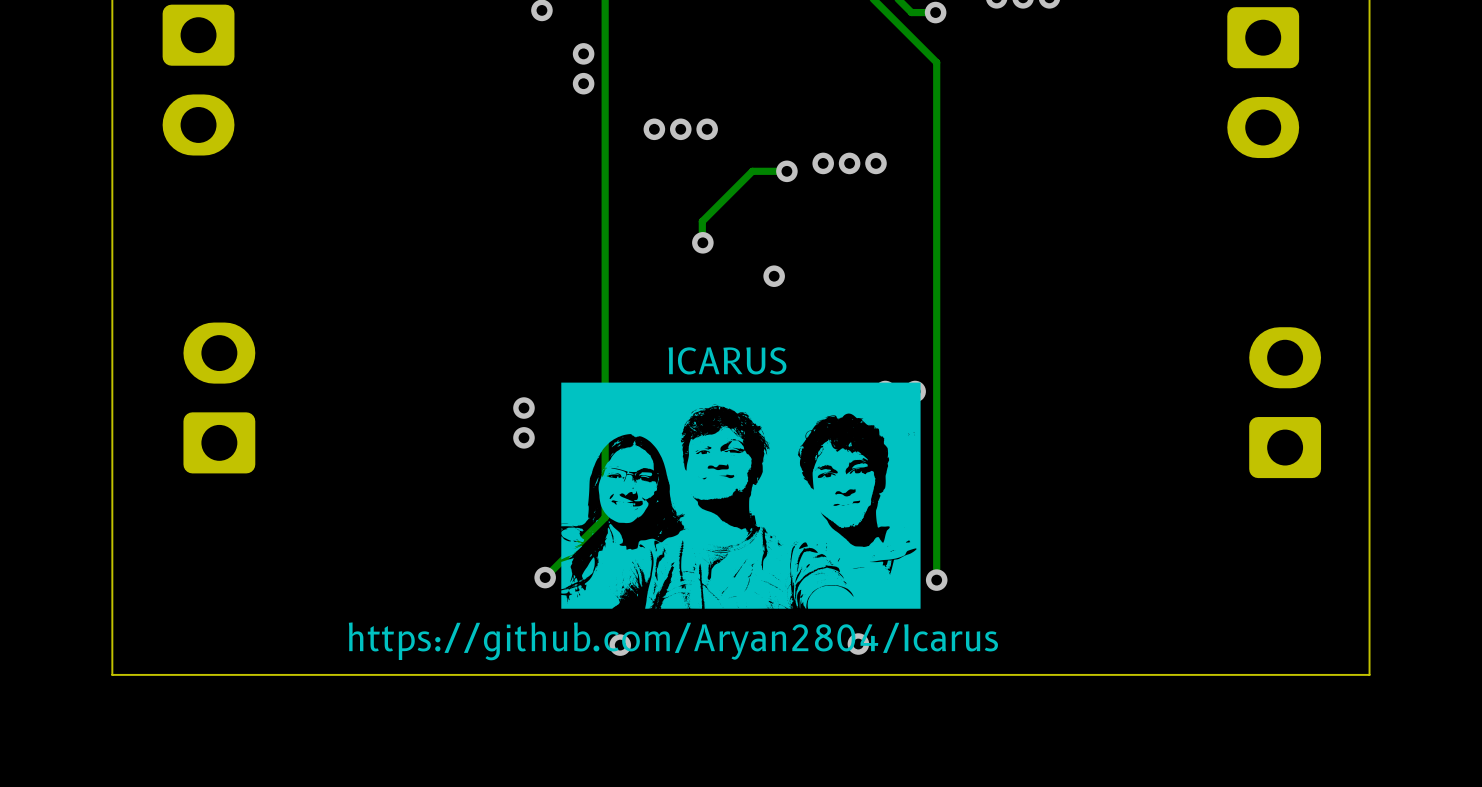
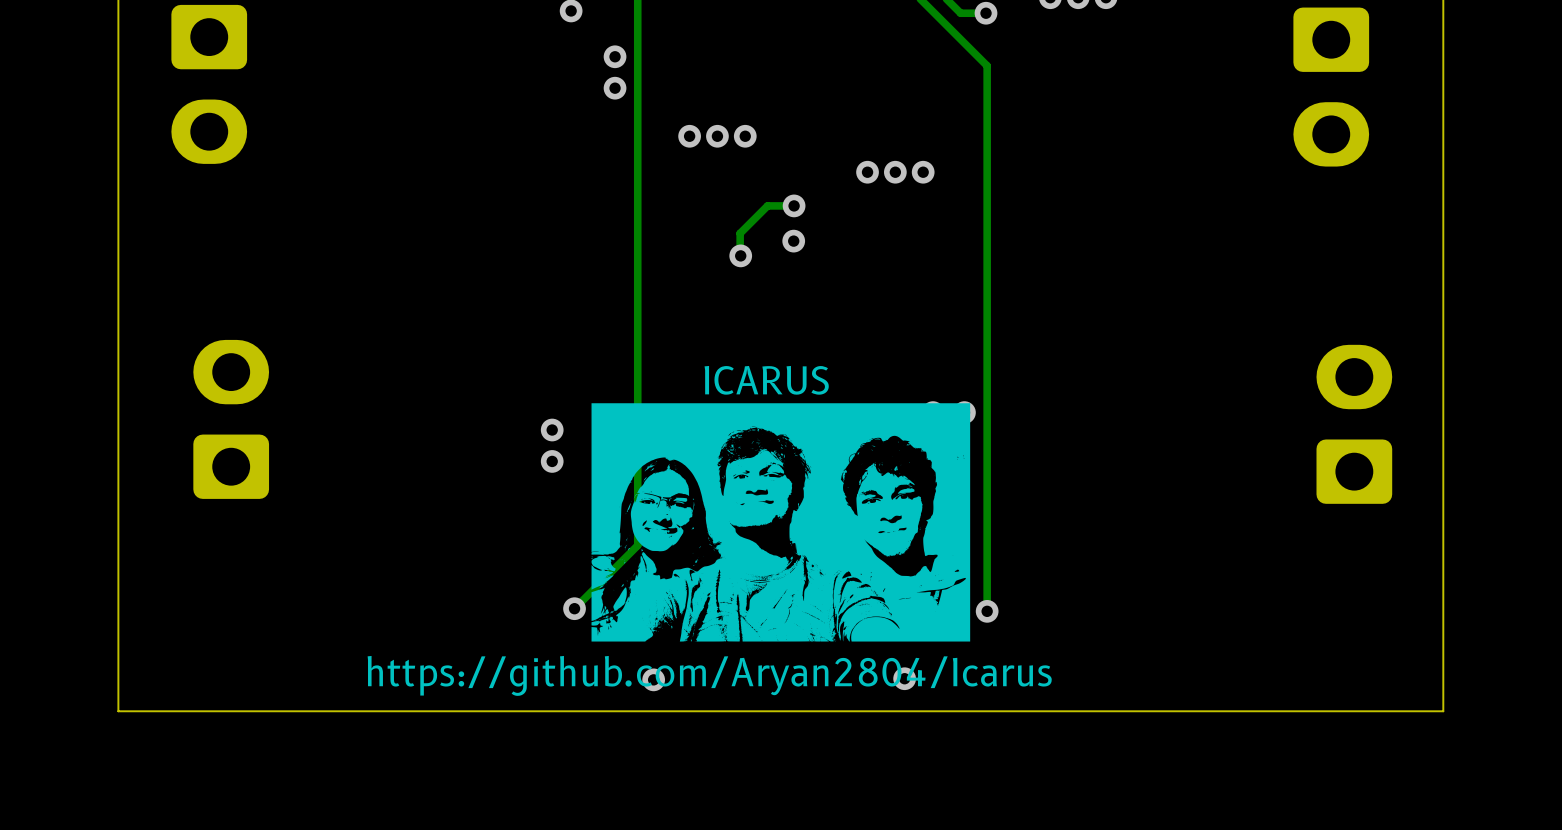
track: (786, 171) (752, 171) (728, 195) -> (794, 205) (767, 205)
via: (786, 171) -> none
via: none -> (794, 205)
via: none -> (793, 241)
via: (774, 276) -> none

